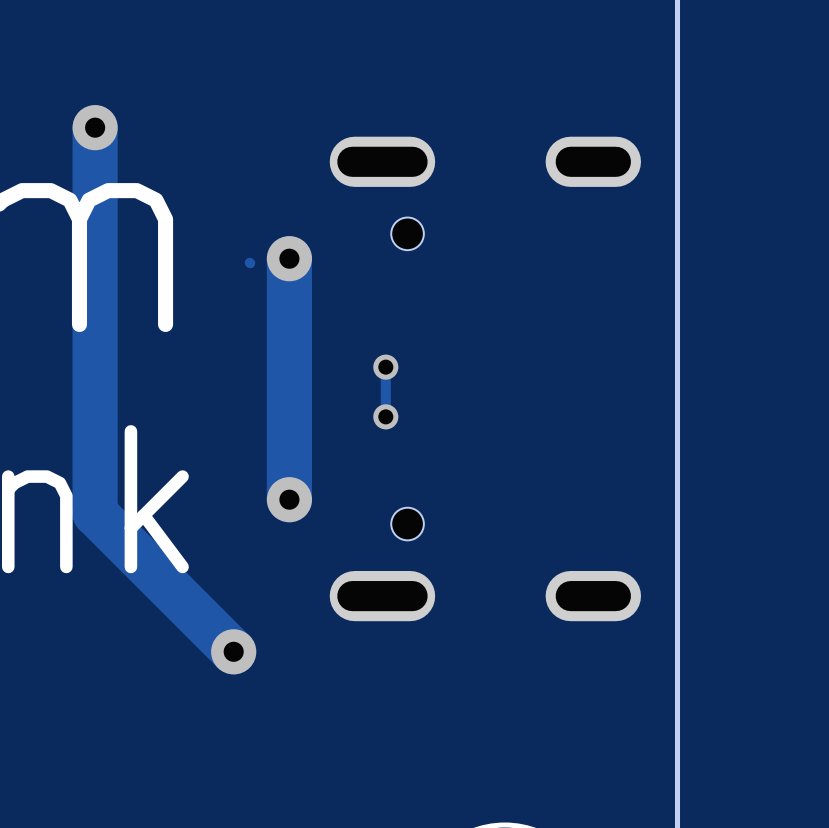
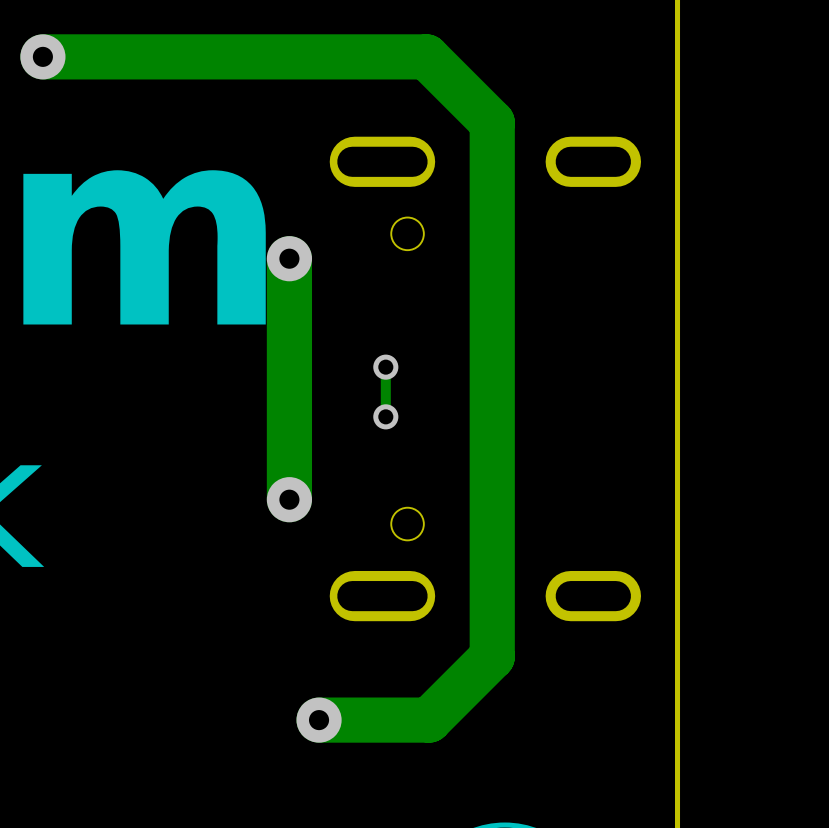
track: none -> (42, 56) (426, 56) (492, 122) (492, 656) (428, 720) (319, 720)
track: (95, 127) (95, 513) (233, 651) -> none
via position: (95, 127) -> (42, 56)
via position: (233, 651) -> (319, 720)

